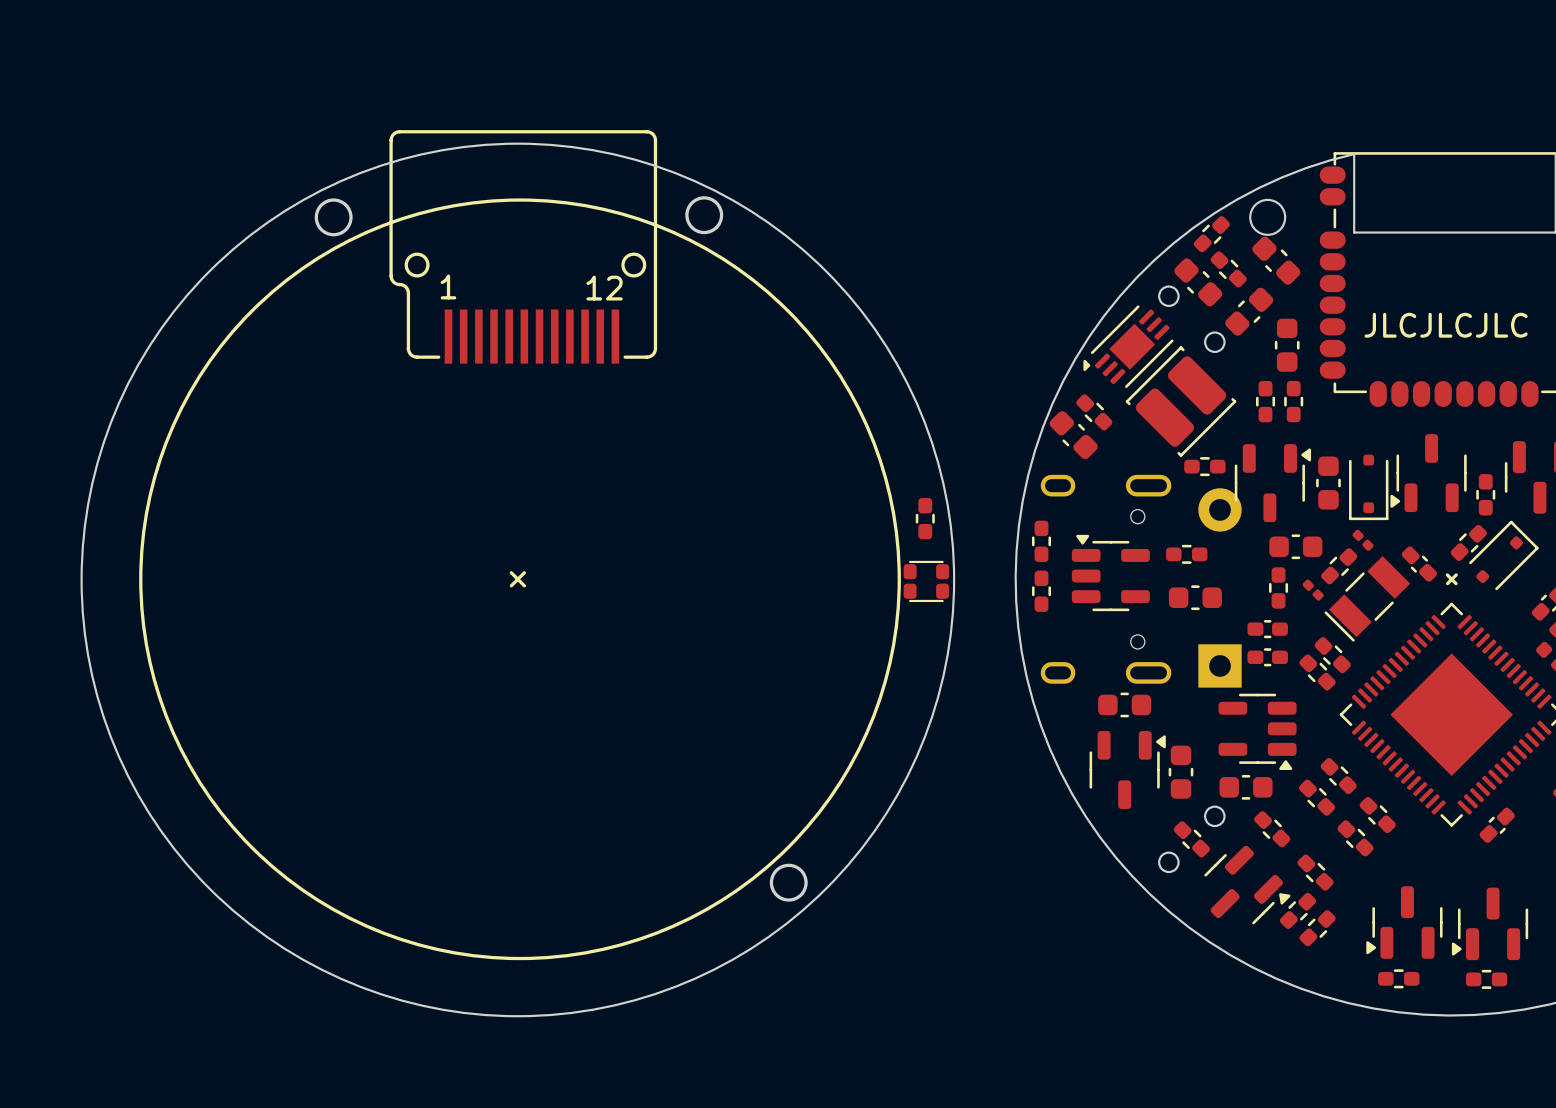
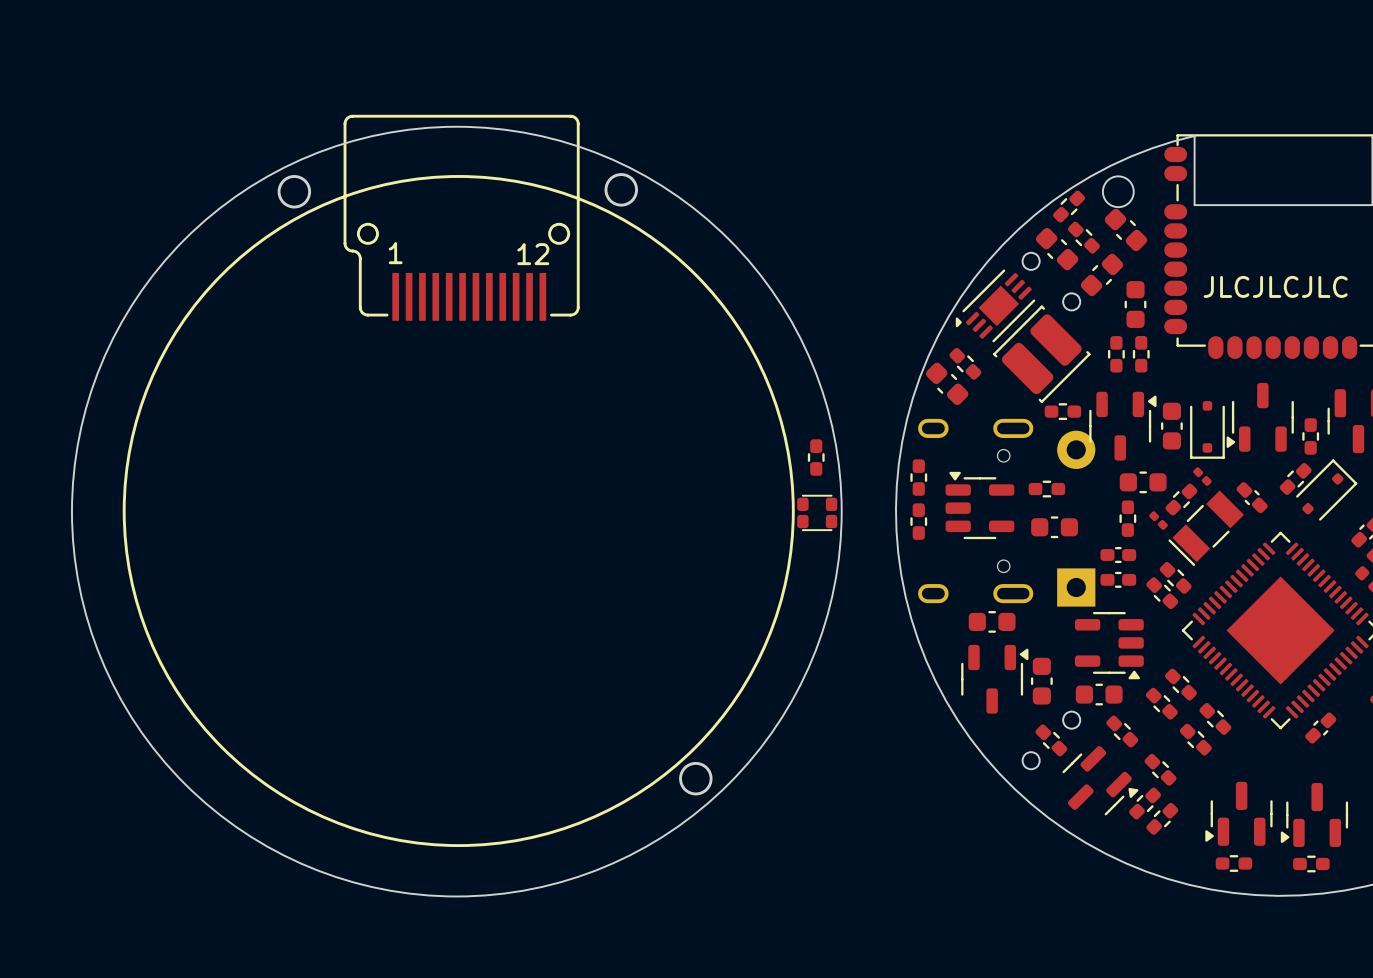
line: (511, 572) (524, 585) -> none
line: (524, 572) (511, 585) -> none
line: (1447, 574) (1456, 583) -> none
line: (1456, 574) (1447, 583) -> none

